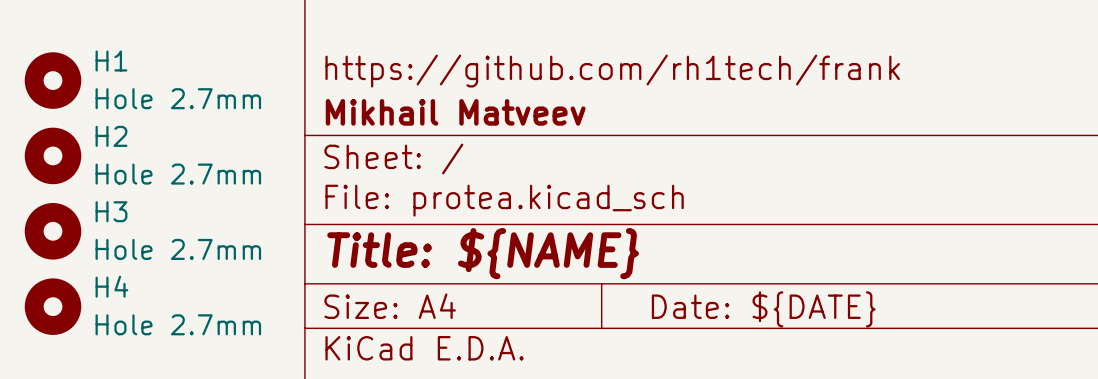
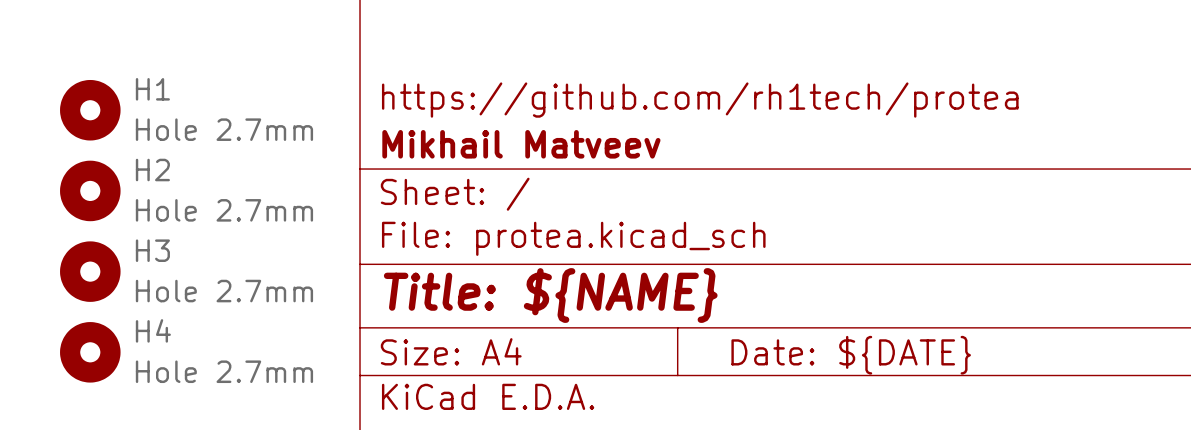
title block: https://github.com/rh1tech/frank (612, 71) -> https://github.com/rh1tech/protea (700, 100)

